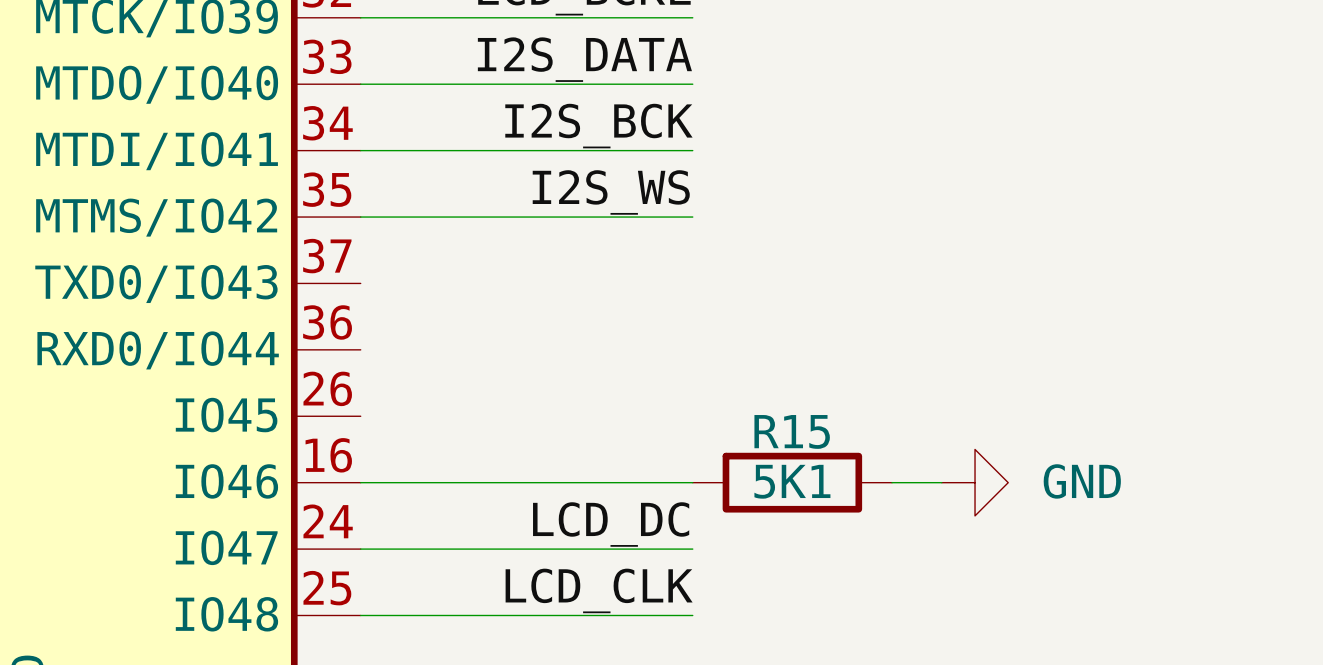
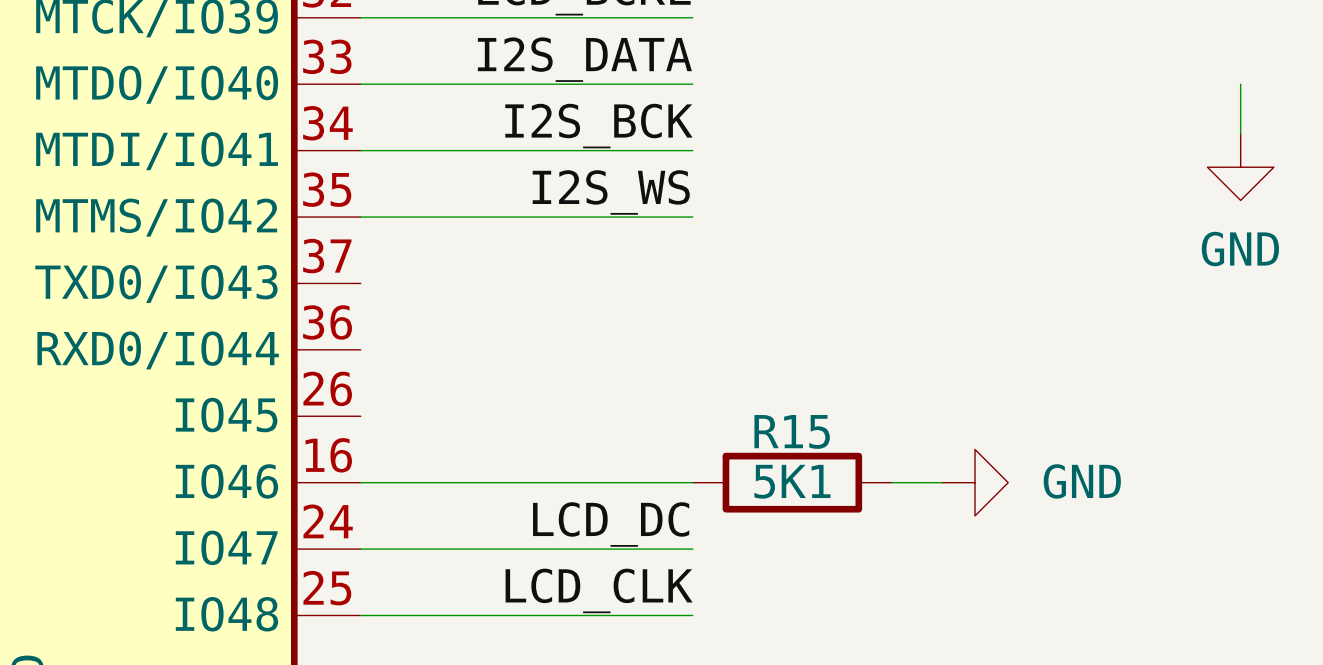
wire: none -> (1240, 84) (1240, 134)
power symbol: none -> GND (1240, 167)

